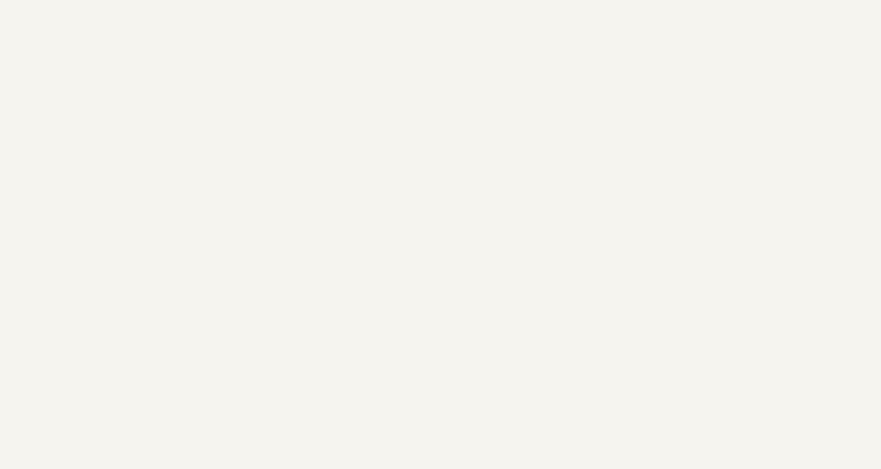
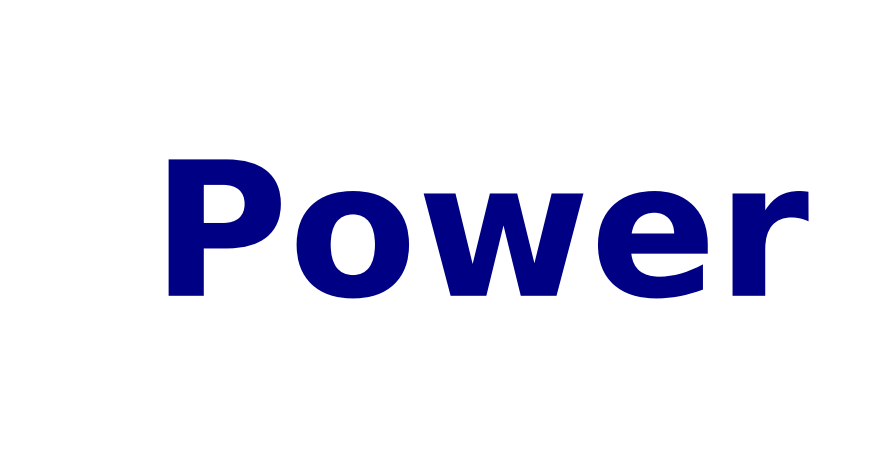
text: none -> Power (488, 228)

